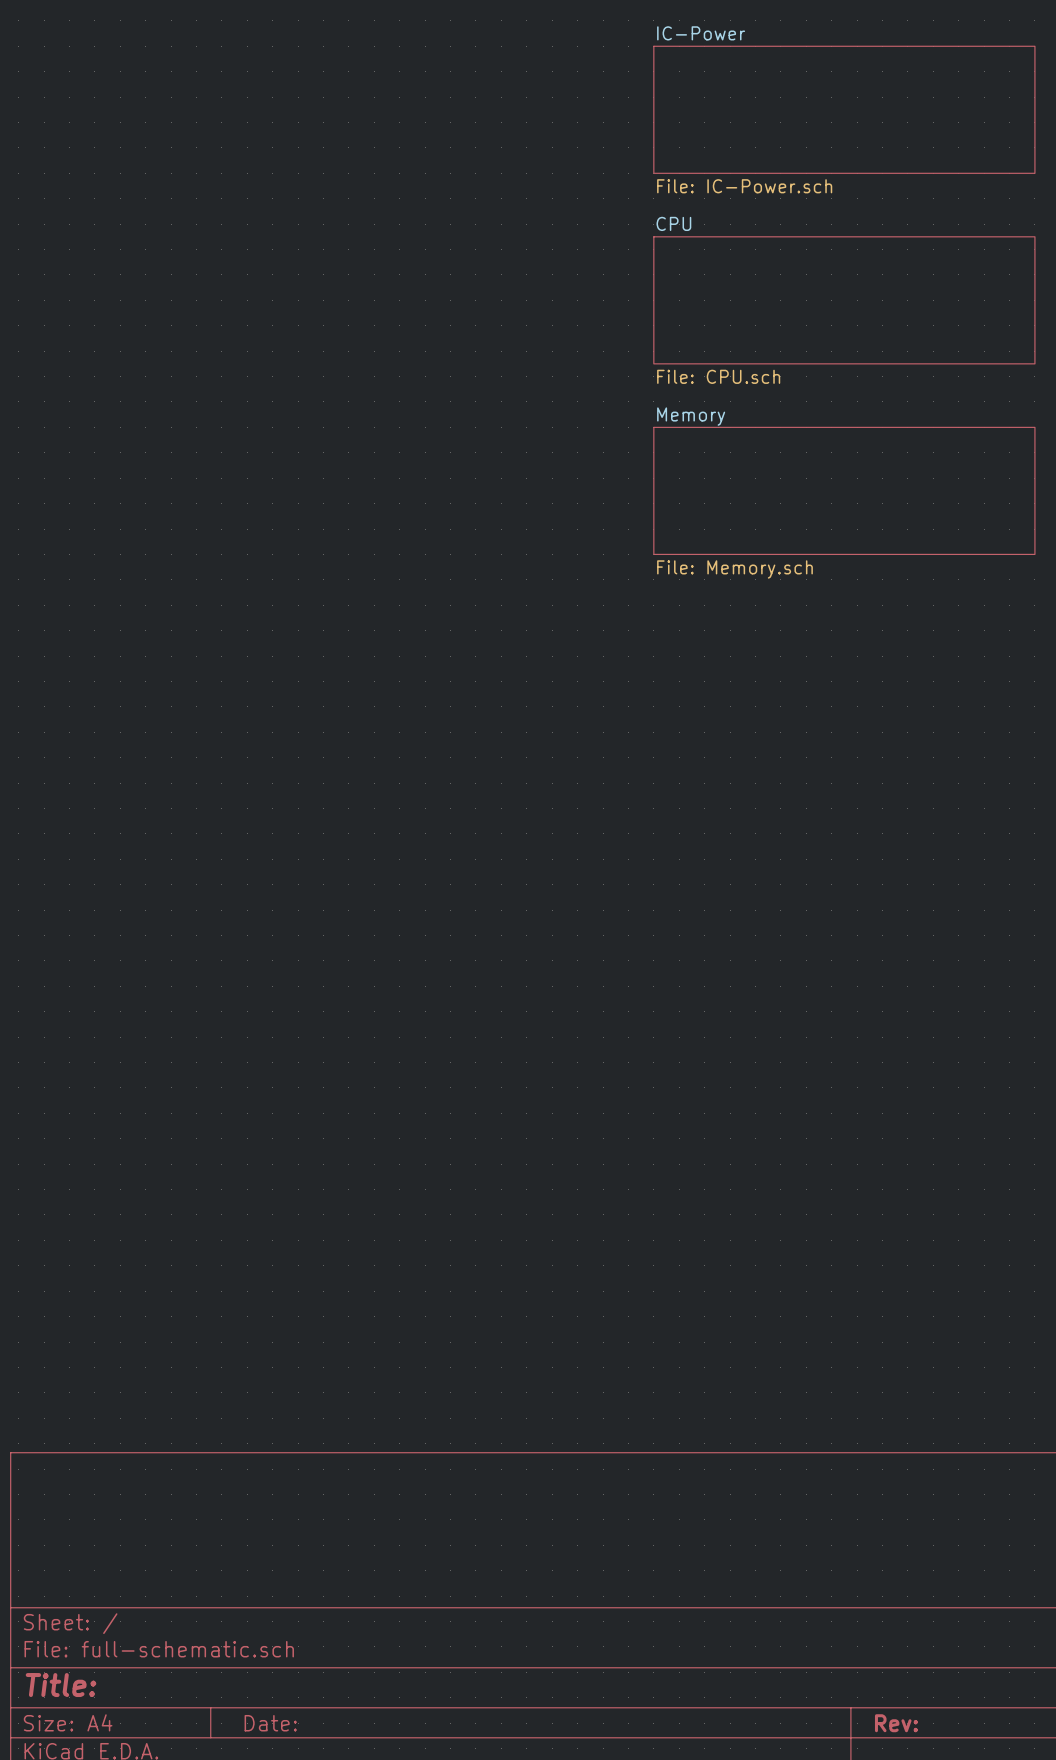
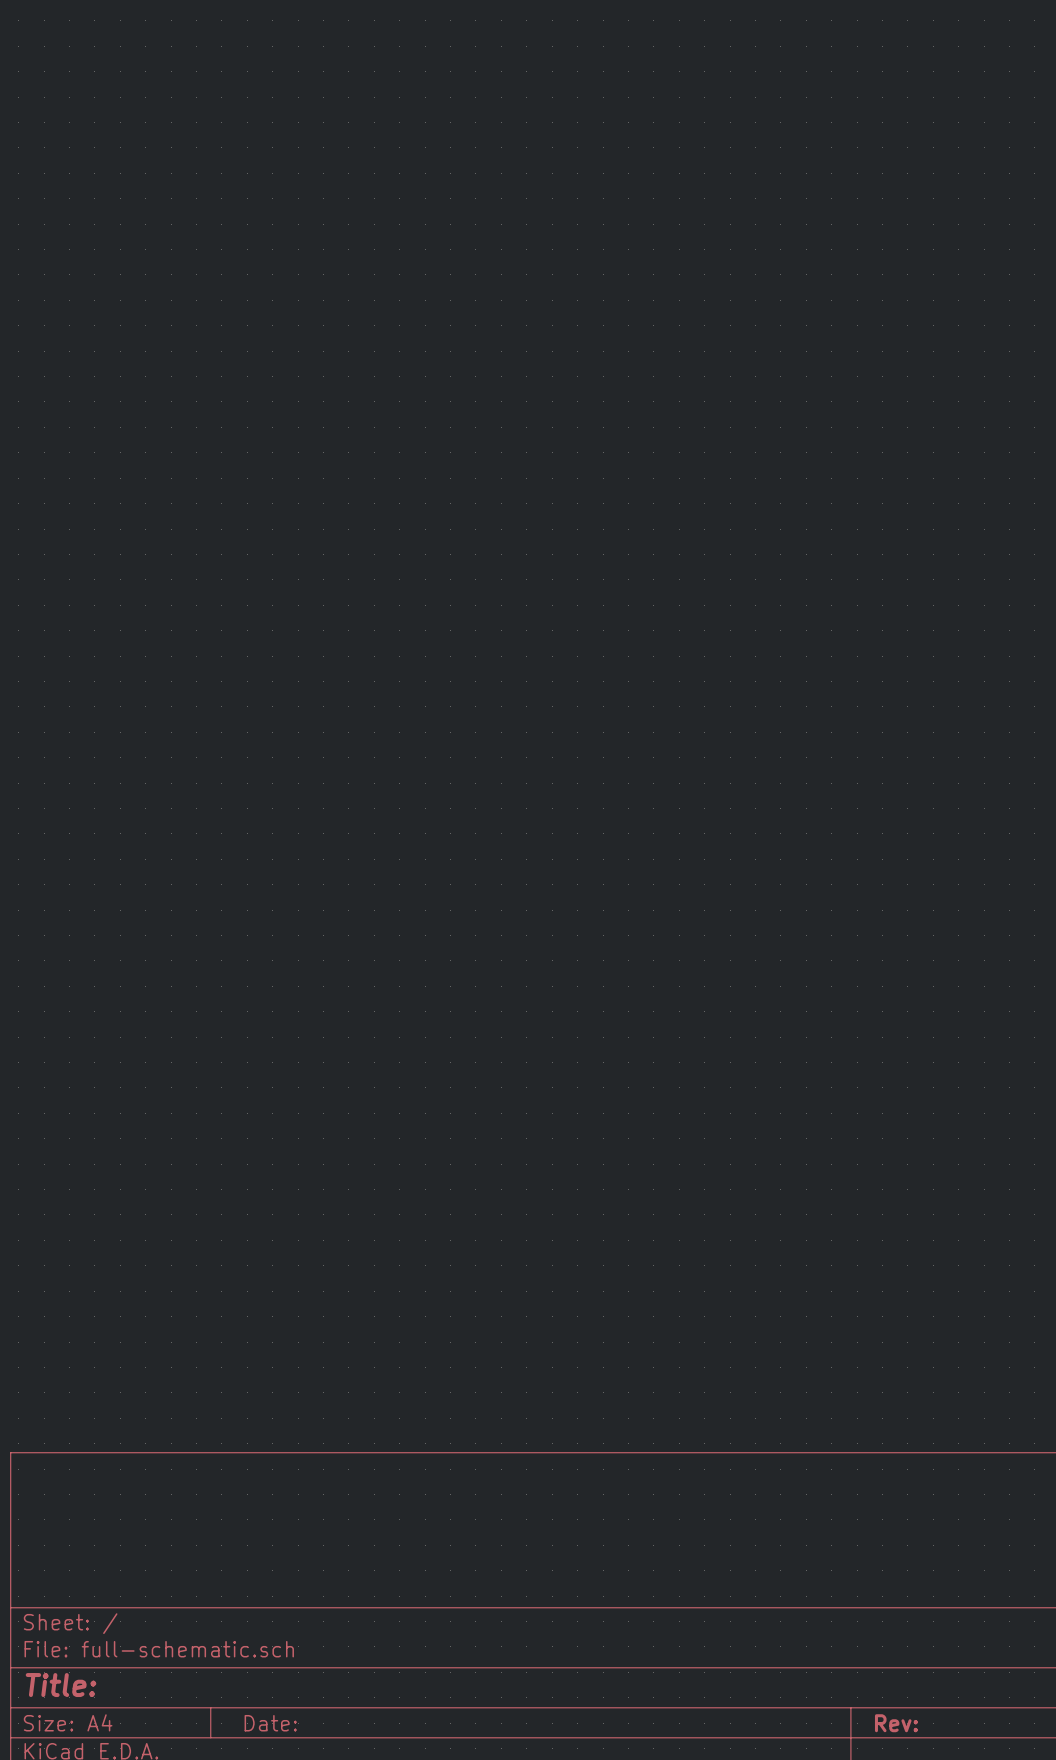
sheet IC-Power: File: IC-Power.sch (844, 109) -> none
sheet CPU: File: CPU.sch (844, 300) -> none
sheet Memory: File: Memory.sch (844, 490) -> none

